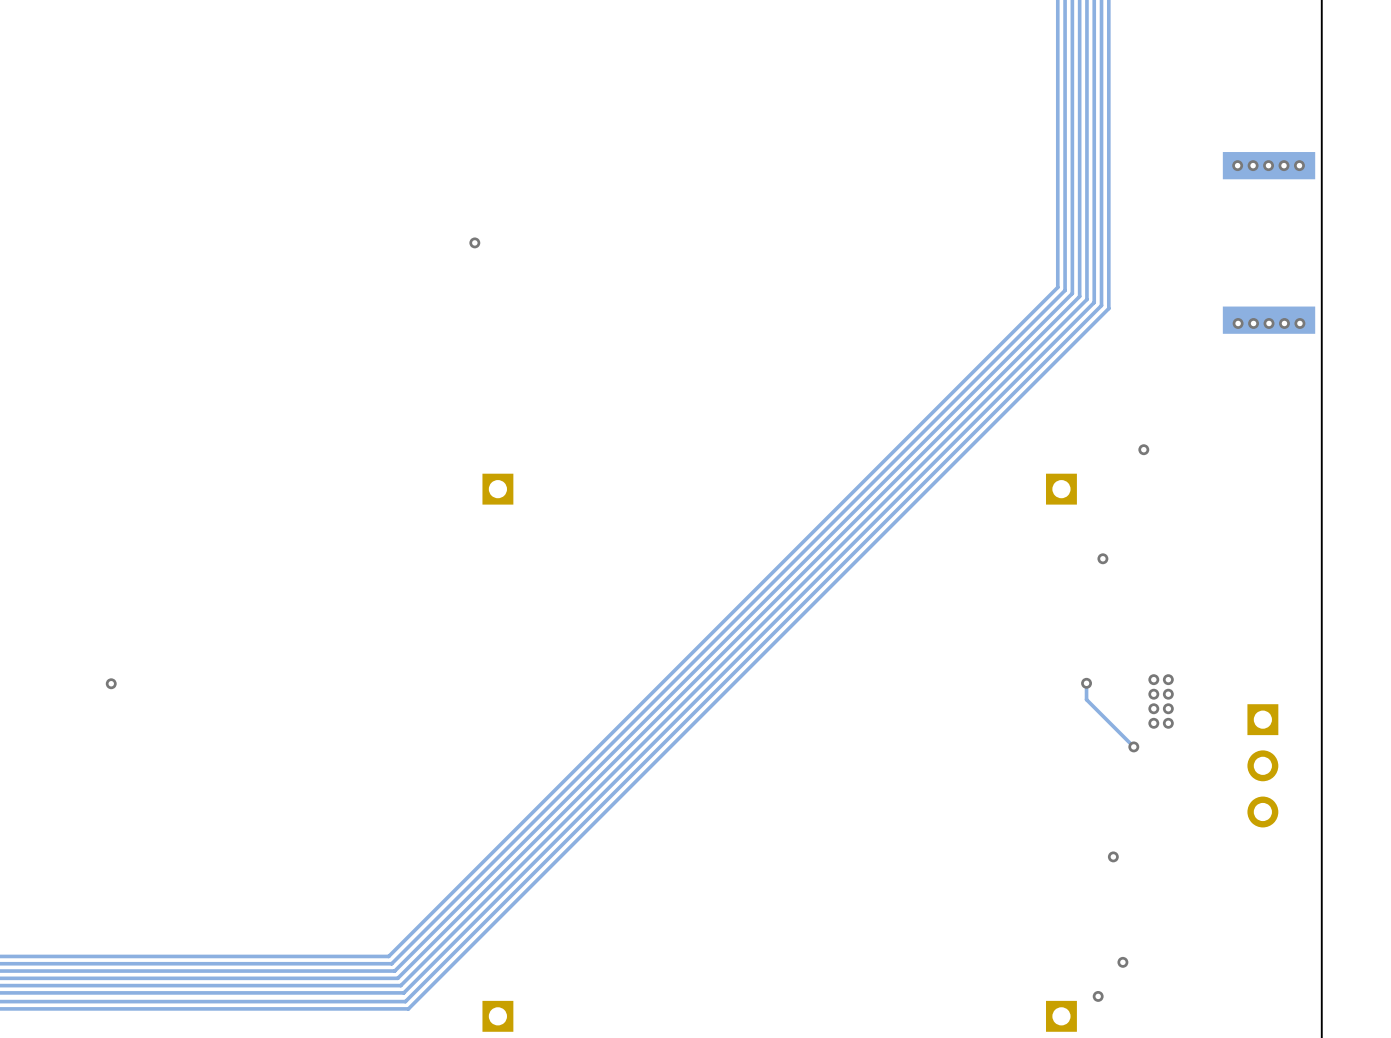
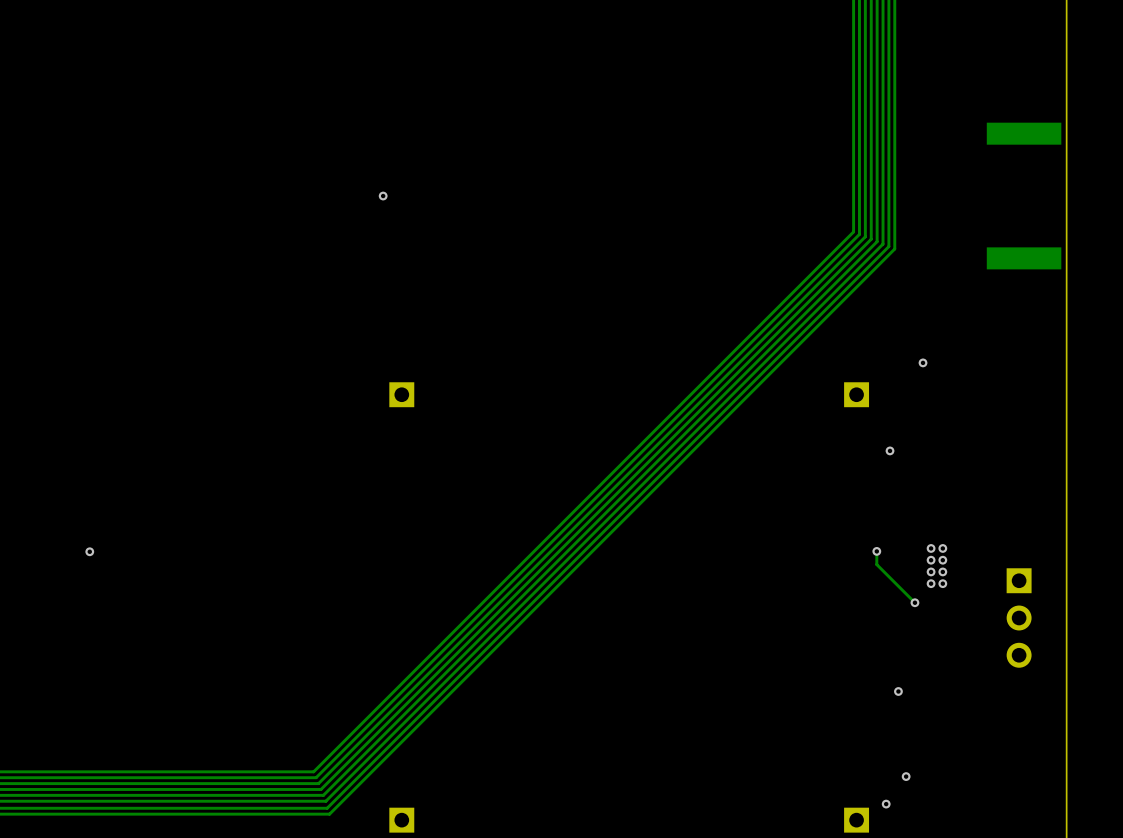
via: (1237, 165) -> none
via: (1253, 165) -> none
via: (1268, 165) -> none
via: (1284, 165) -> none
via: (1299, 165) -> none
via: (1238, 323) -> none
via: (1253, 323) -> none
via: (1269, 323) -> none
via: (1284, 323) -> none
via: (1299, 323) -> none

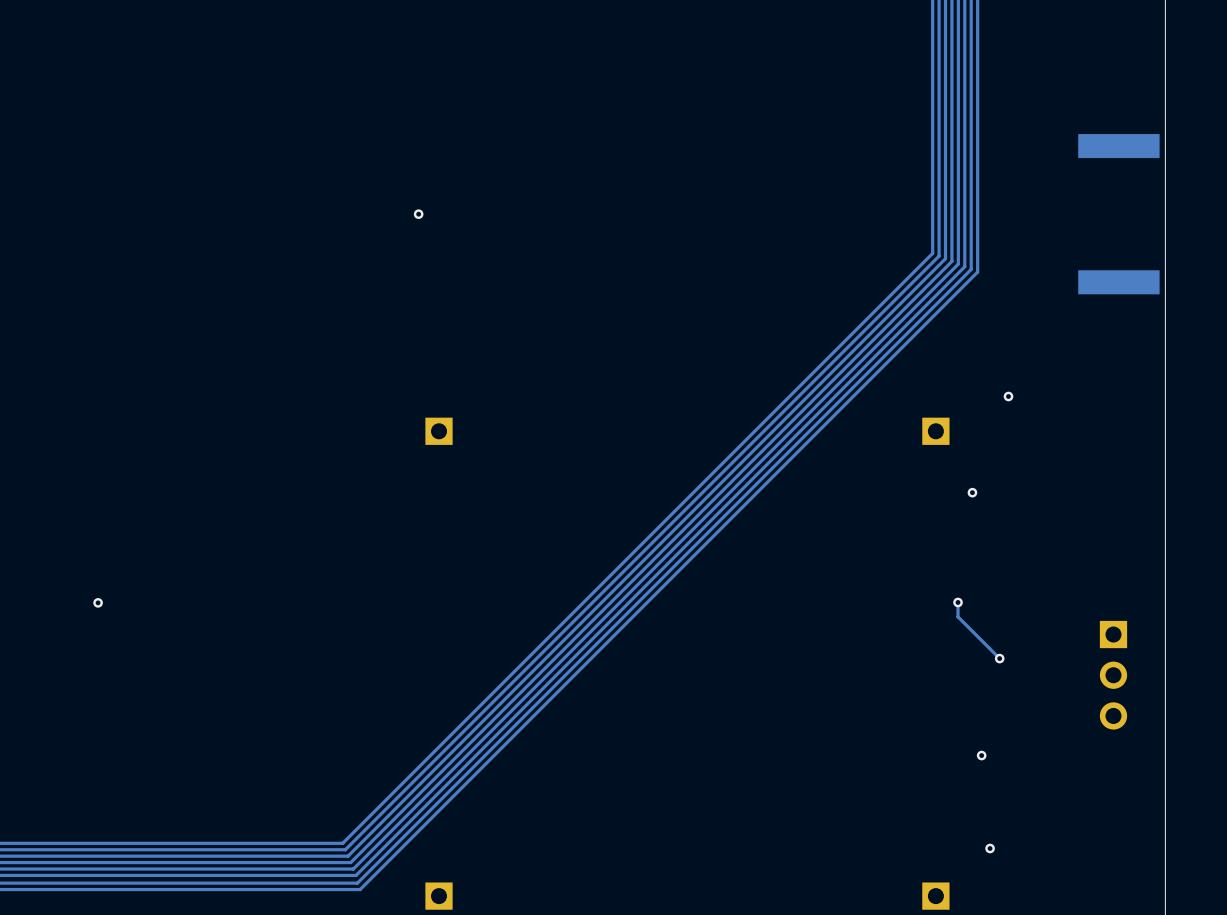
via: (931, 548) -> none
via: (942, 548) -> none
via: (931, 560) -> none
via: (942, 560) -> none
via: (931, 571) -> none
via: (942, 571) -> none
via: (931, 583) -> none
via: (942, 583) -> none
via: (886, 804) -> none

